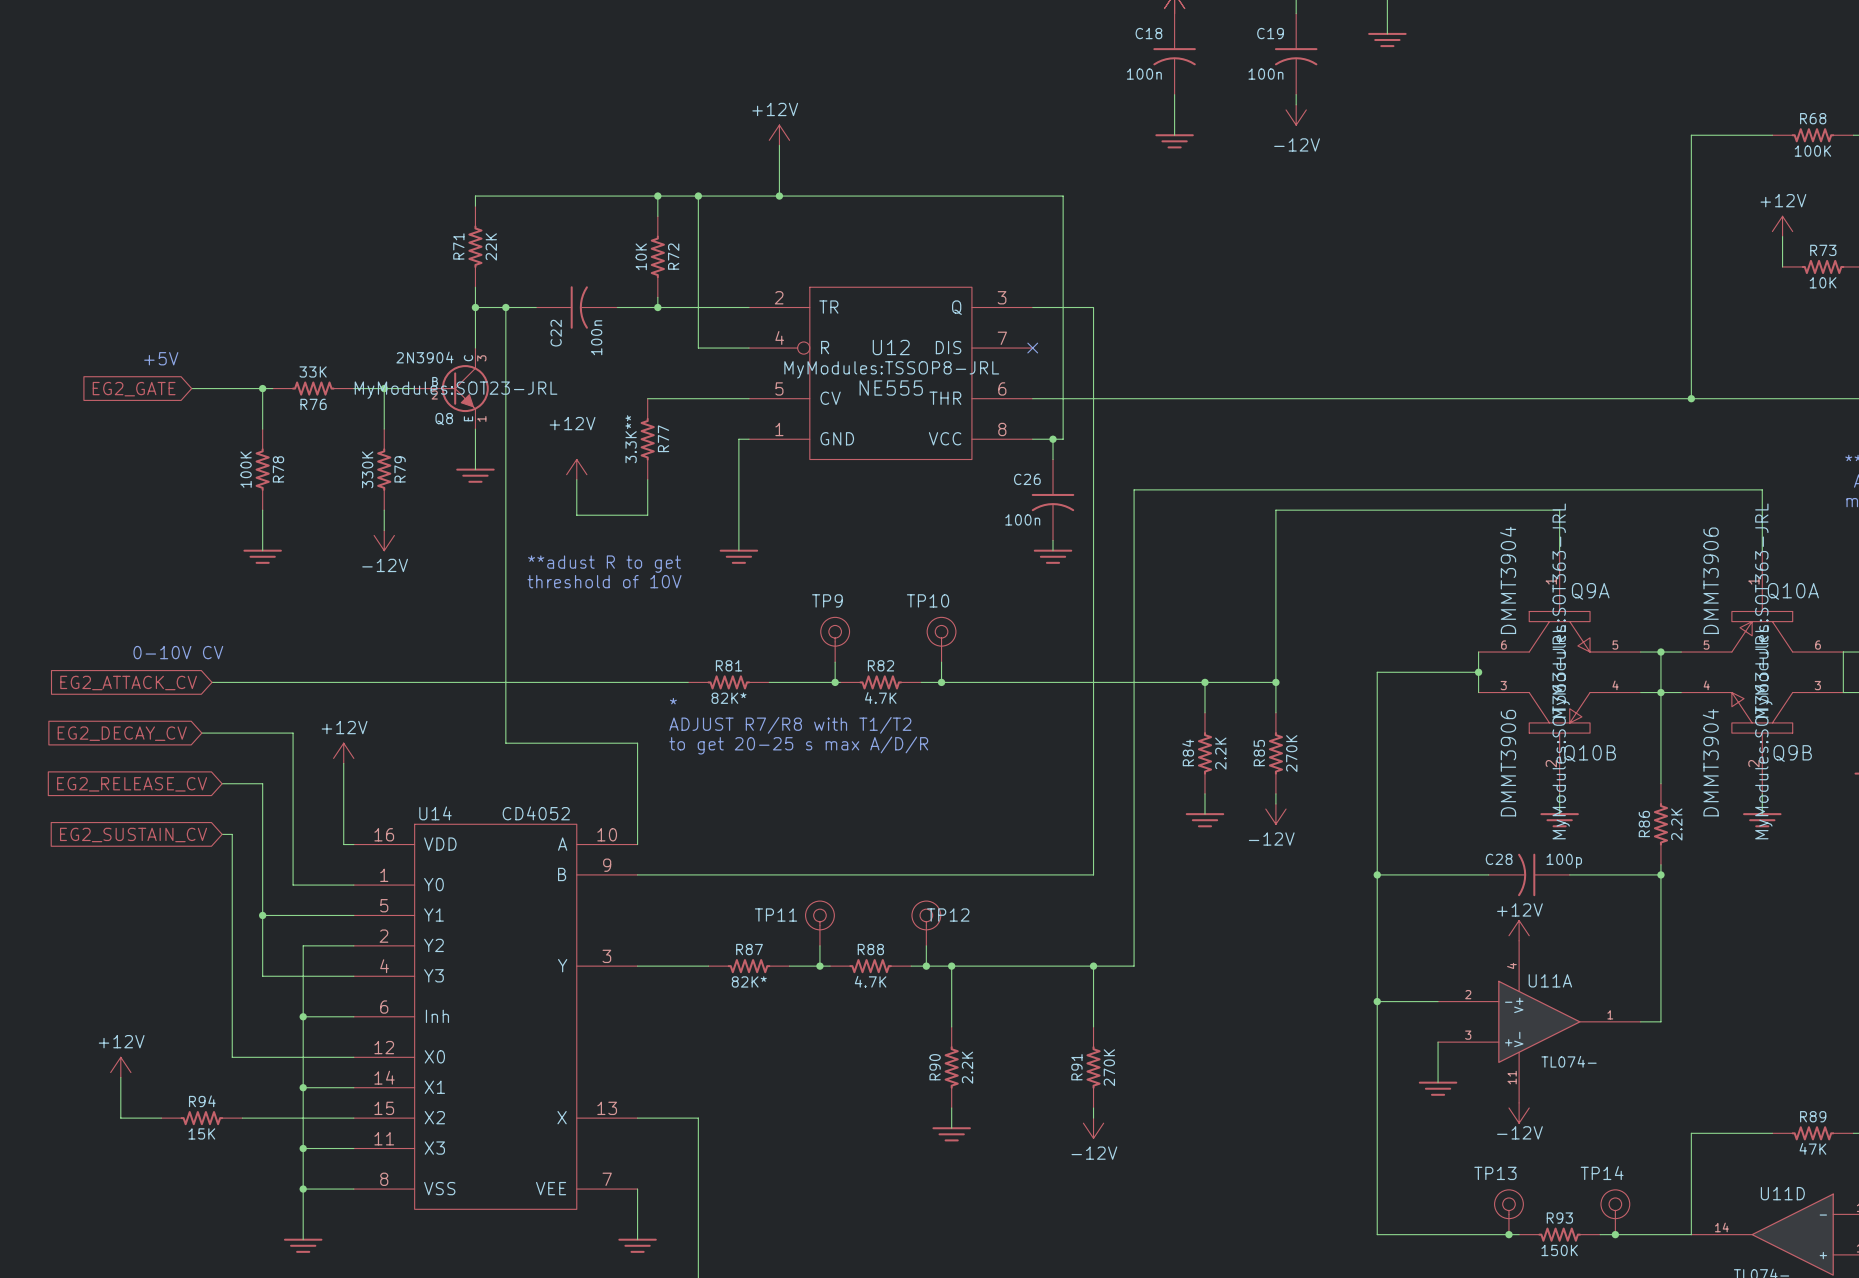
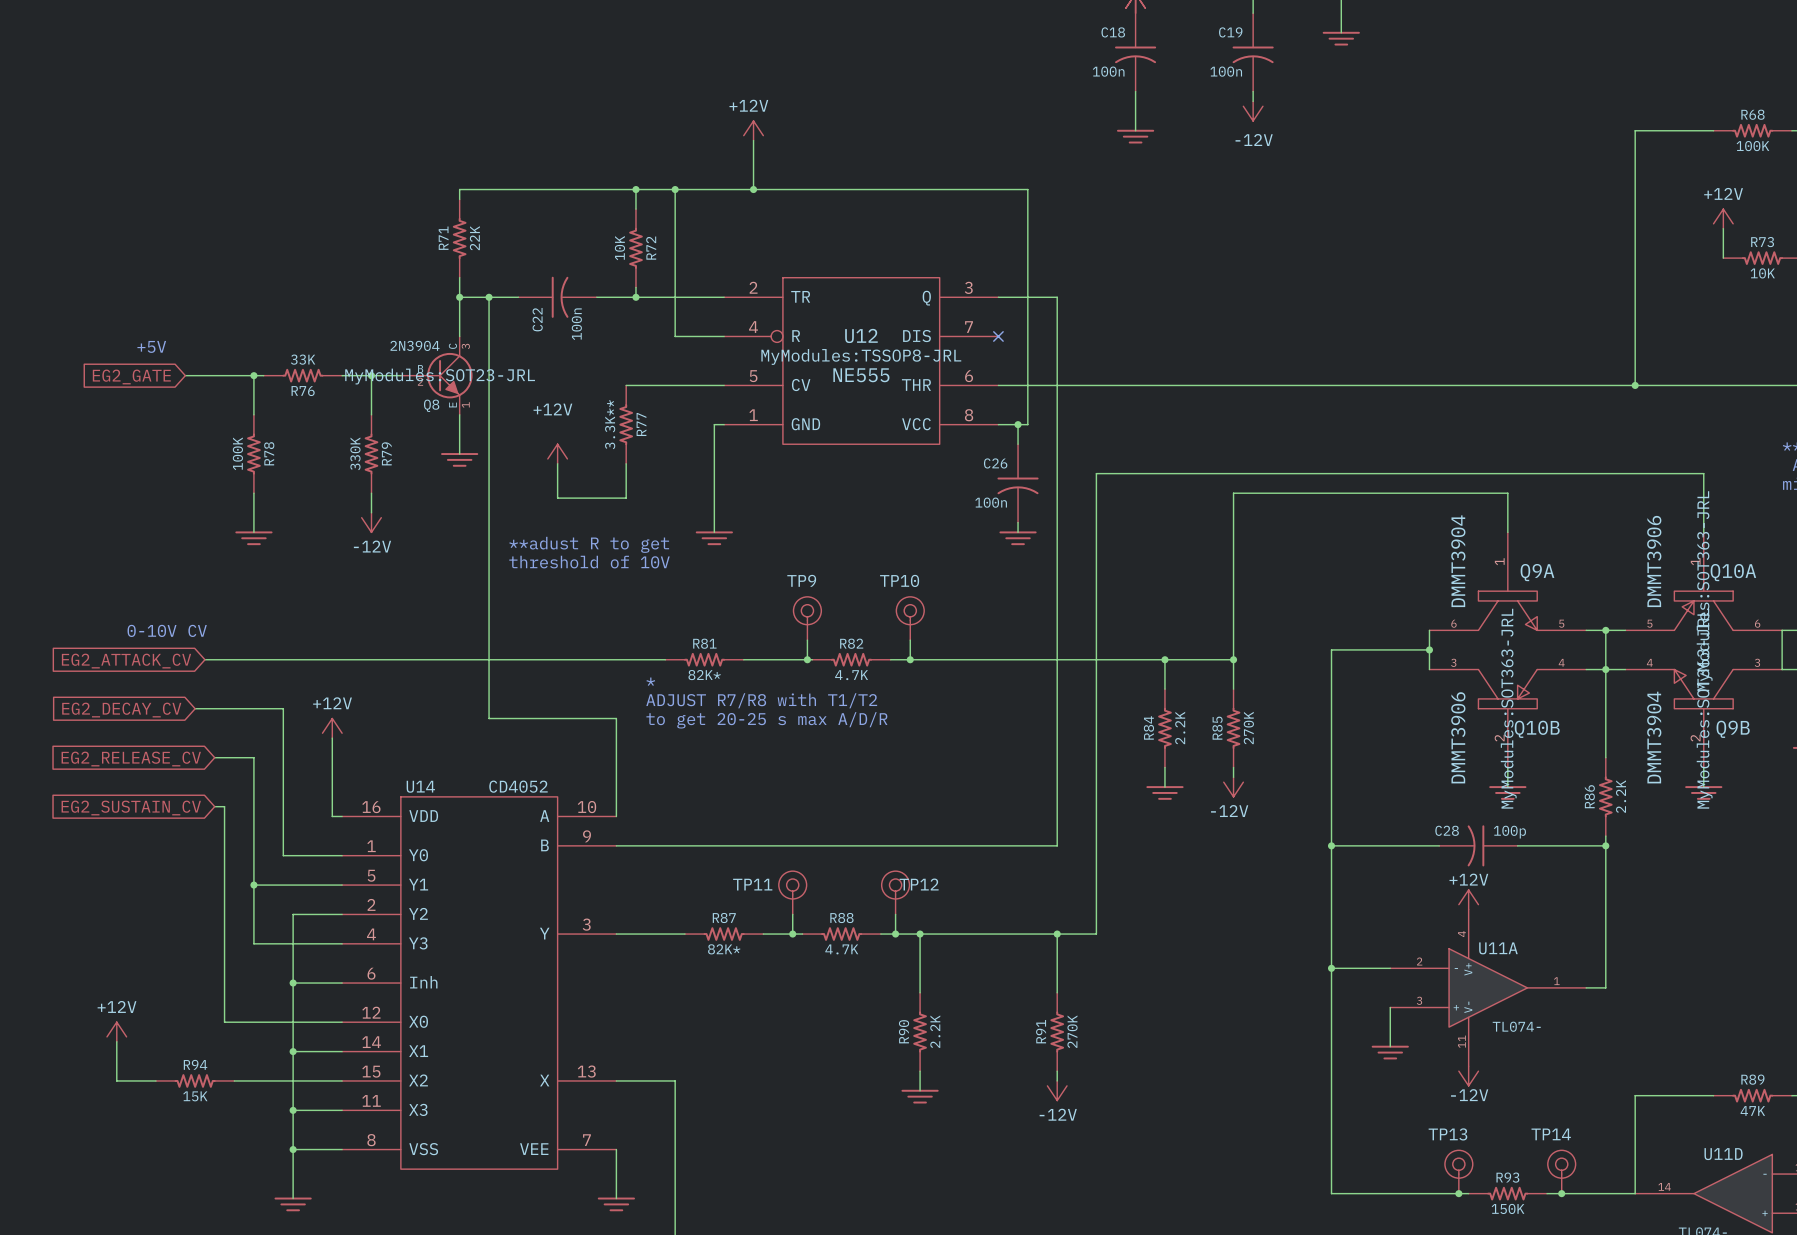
Q9A text: MyModules:SOT363-JRL (1561, 610) -> none

